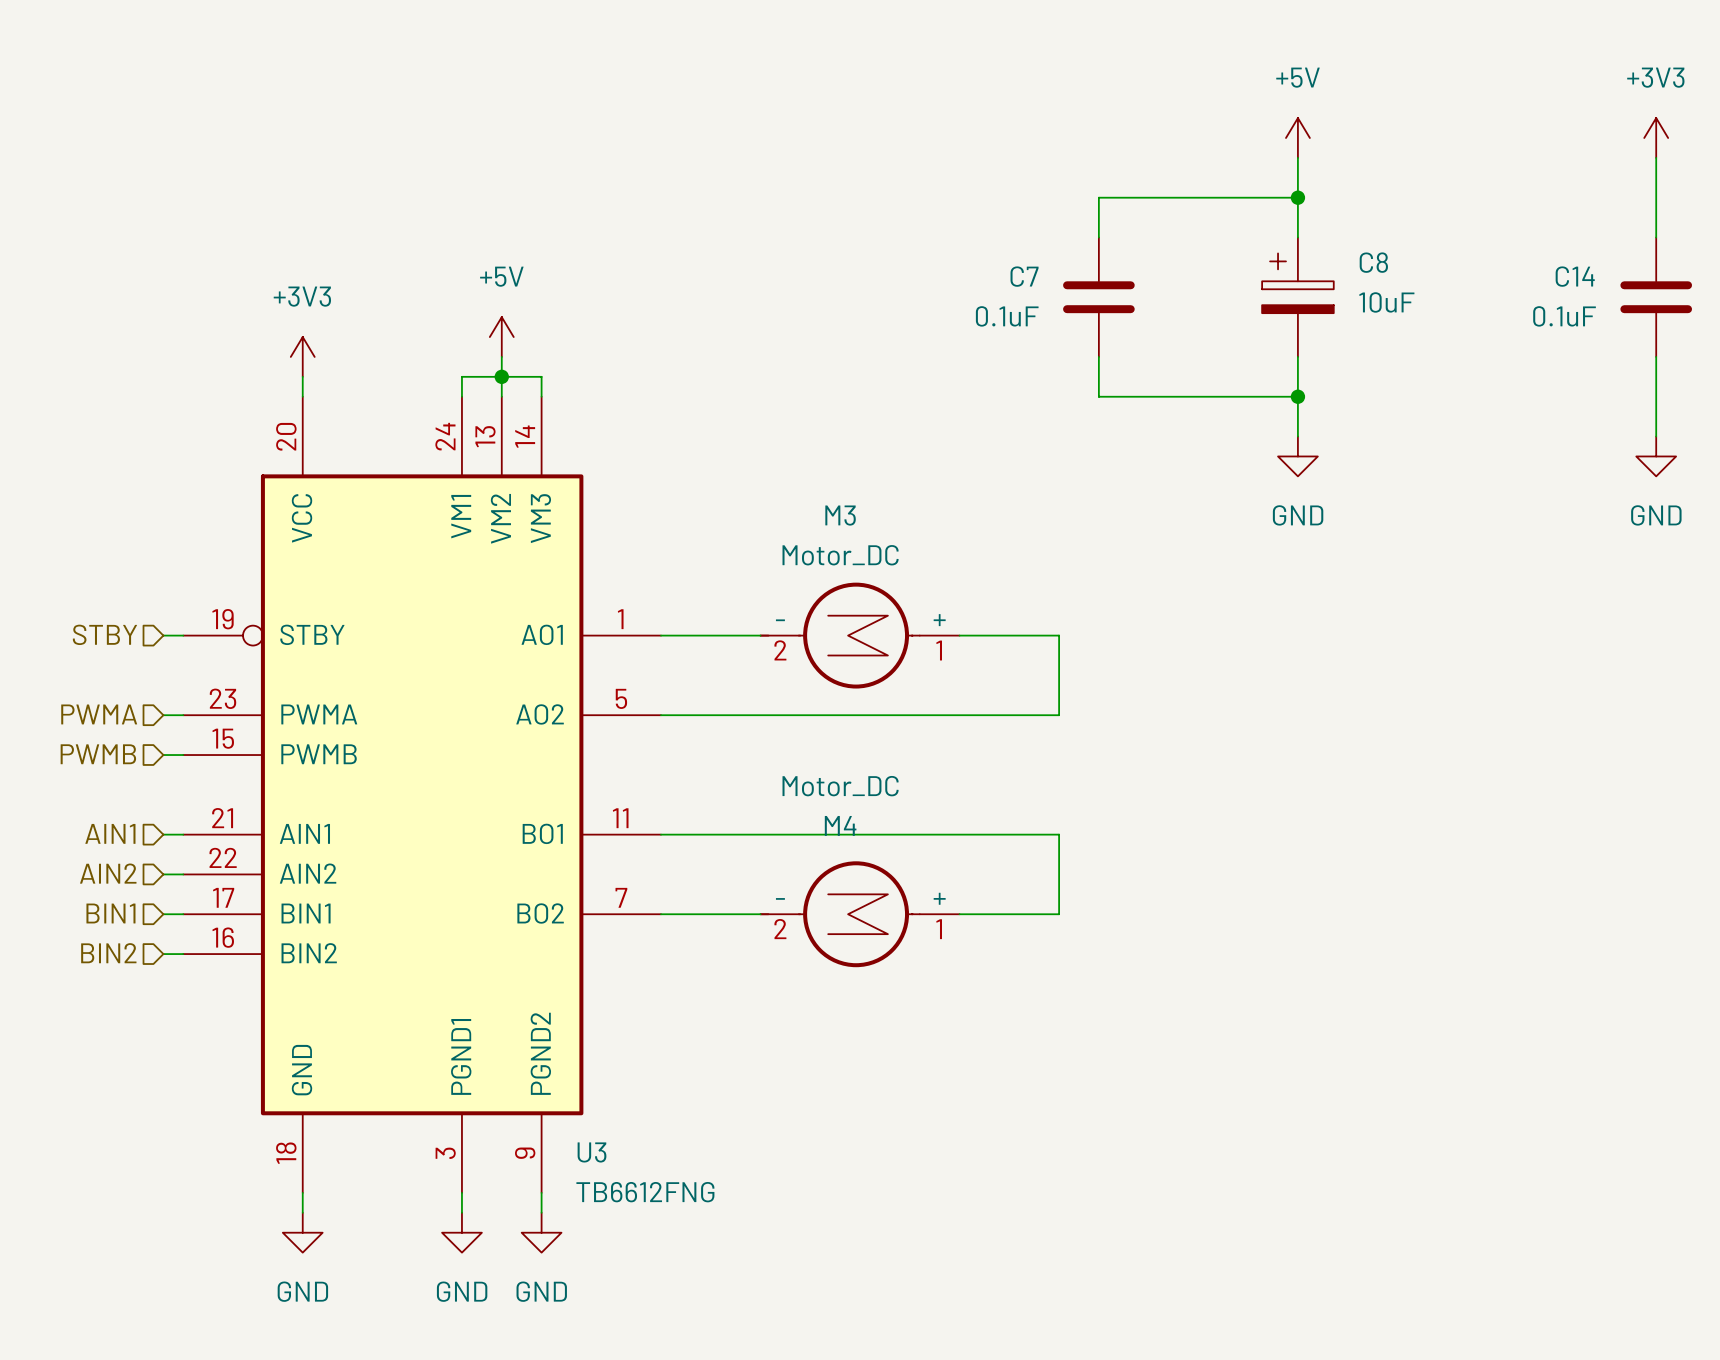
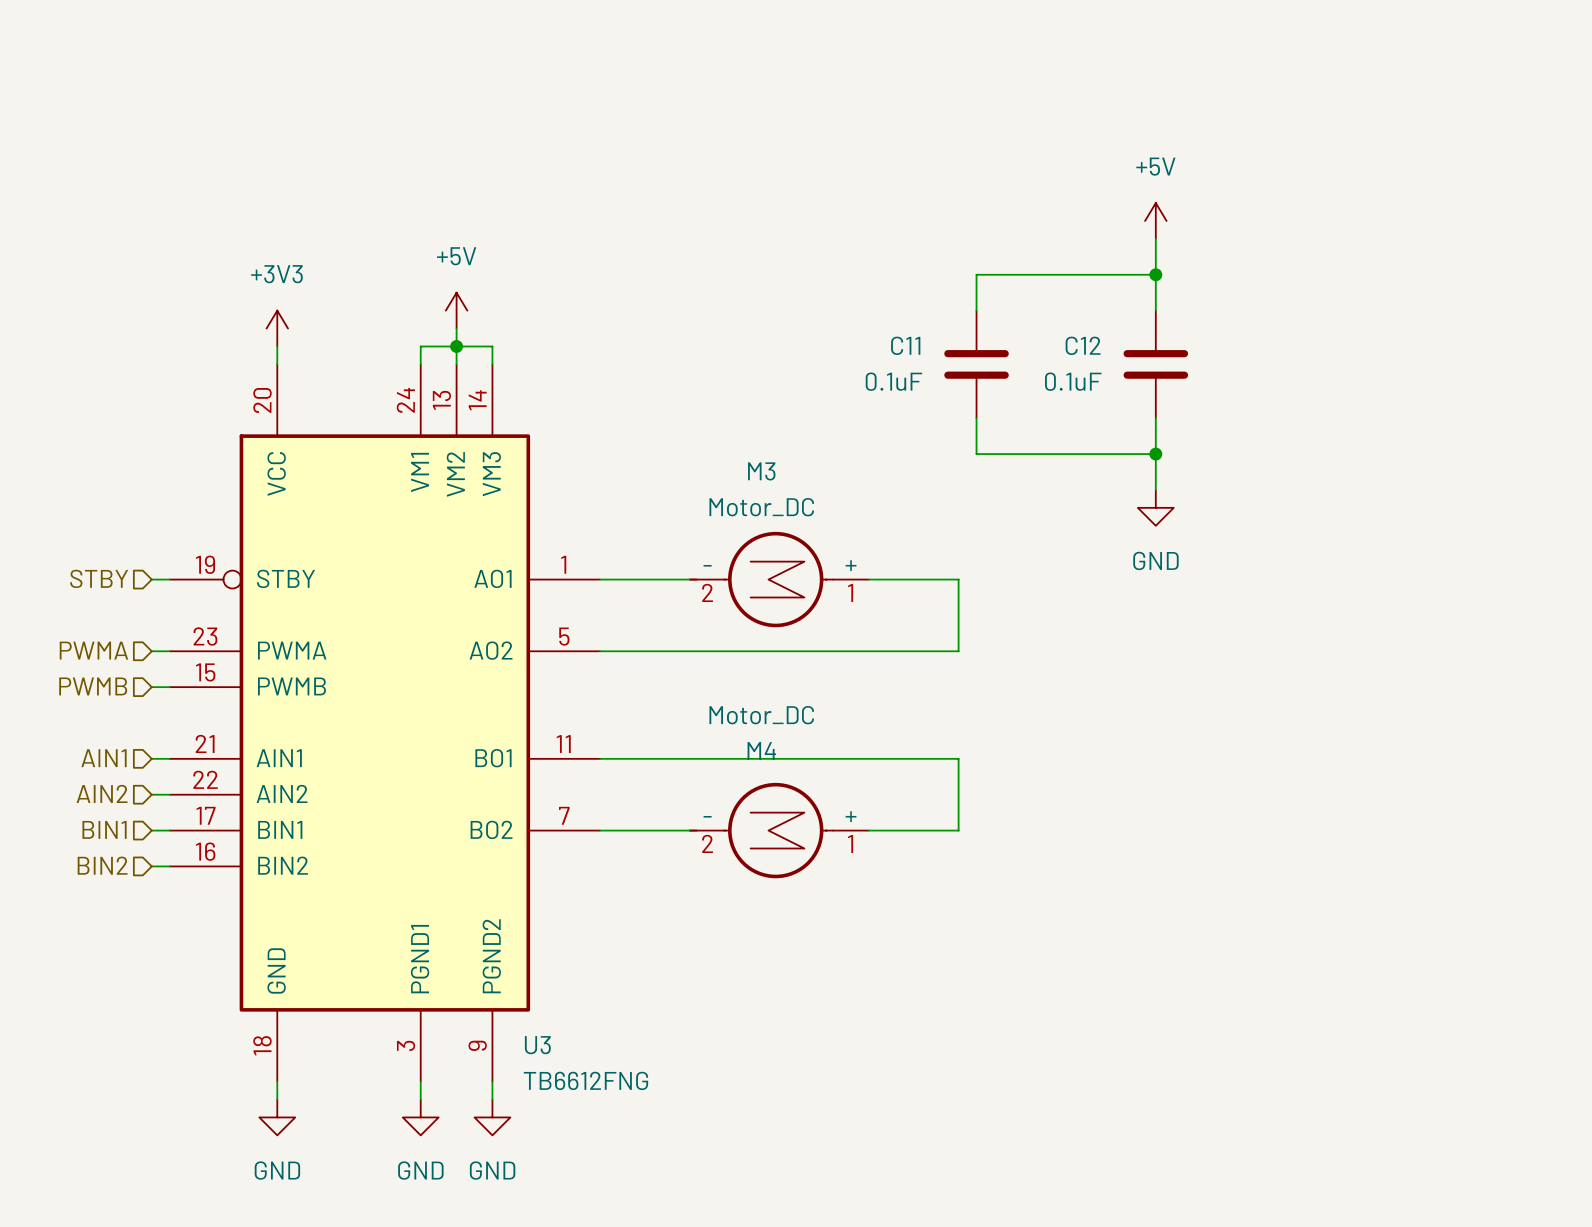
power symbol position: +5V (1297, 137) -> +5V (1155, 220)
power symbol: +3V3 (1656, 137) -> none
wire: (1297, 157) (1297, 237) -> (1155, 238) (1155, 310)
wire: (1656, 157) (1656, 237) -> none
wire: (1297, 197) (1098, 197) (1098, 237) -> (1155, 274) (976, 274) (976, 310)
junction: (1297, 197) -> none
C7: 0.1uF (1098, 297) -> none
junction: none -> (1155, 274)
C8: 10uF (1297, 297) -> none
C14: 0.1uF (1656, 297) -> none
wire: (1098, 356) (1098, 396) (1297, 396) -> (976, 418) (976, 454) (1155, 454)
wire: (1297, 356) (1297, 436) -> (1155, 418) (1155, 489)
wire: (1656, 356) (1656, 436) -> none
C11: none -> 0.1uF (976, 364)
C12: none -> 0.1uF (1155, 364)
junction: (1297, 396) -> none
power symbol position: GND (1297, 456) -> GND (1155, 507)
power symbol: GND (1656, 456) -> none
junction: none -> (1155, 454)

